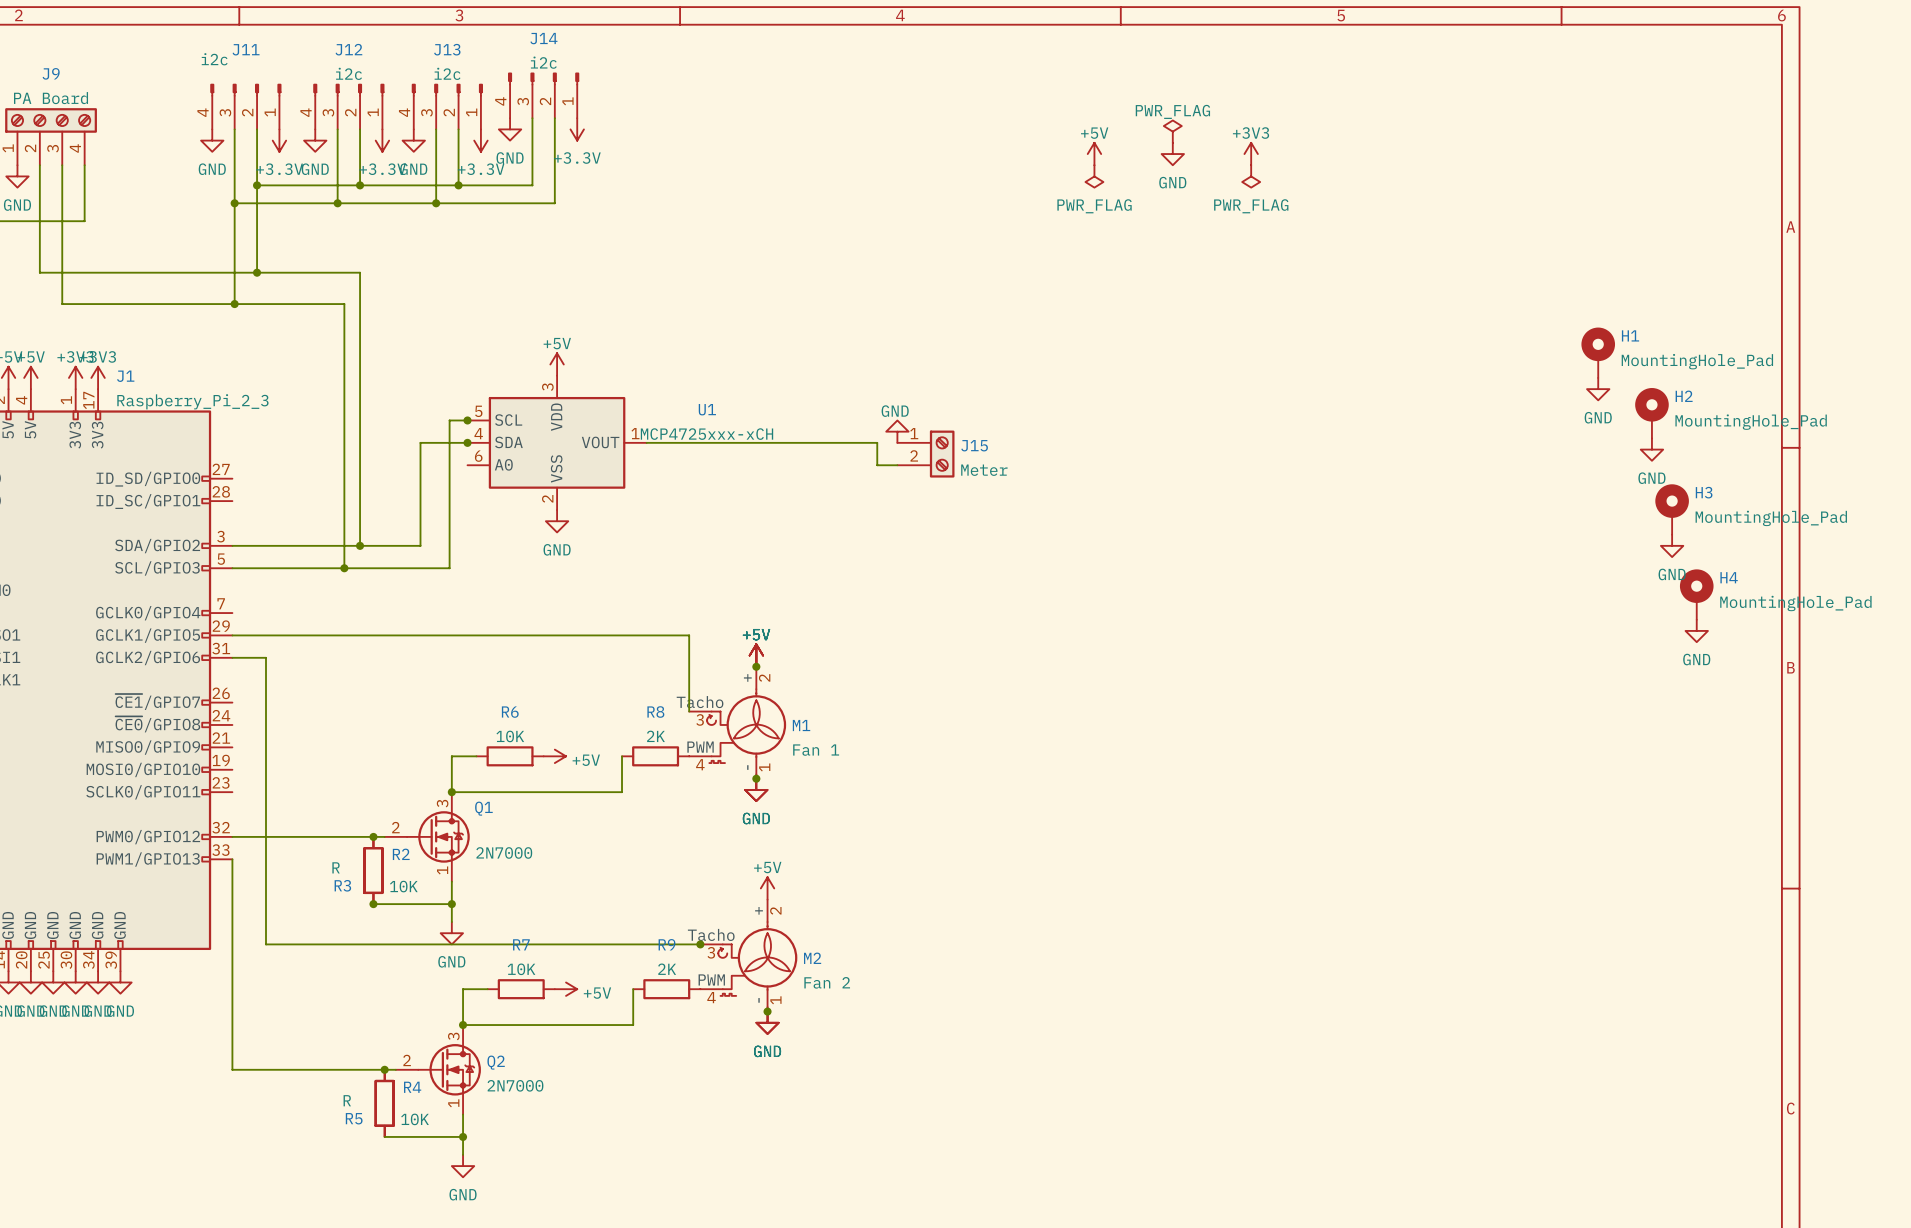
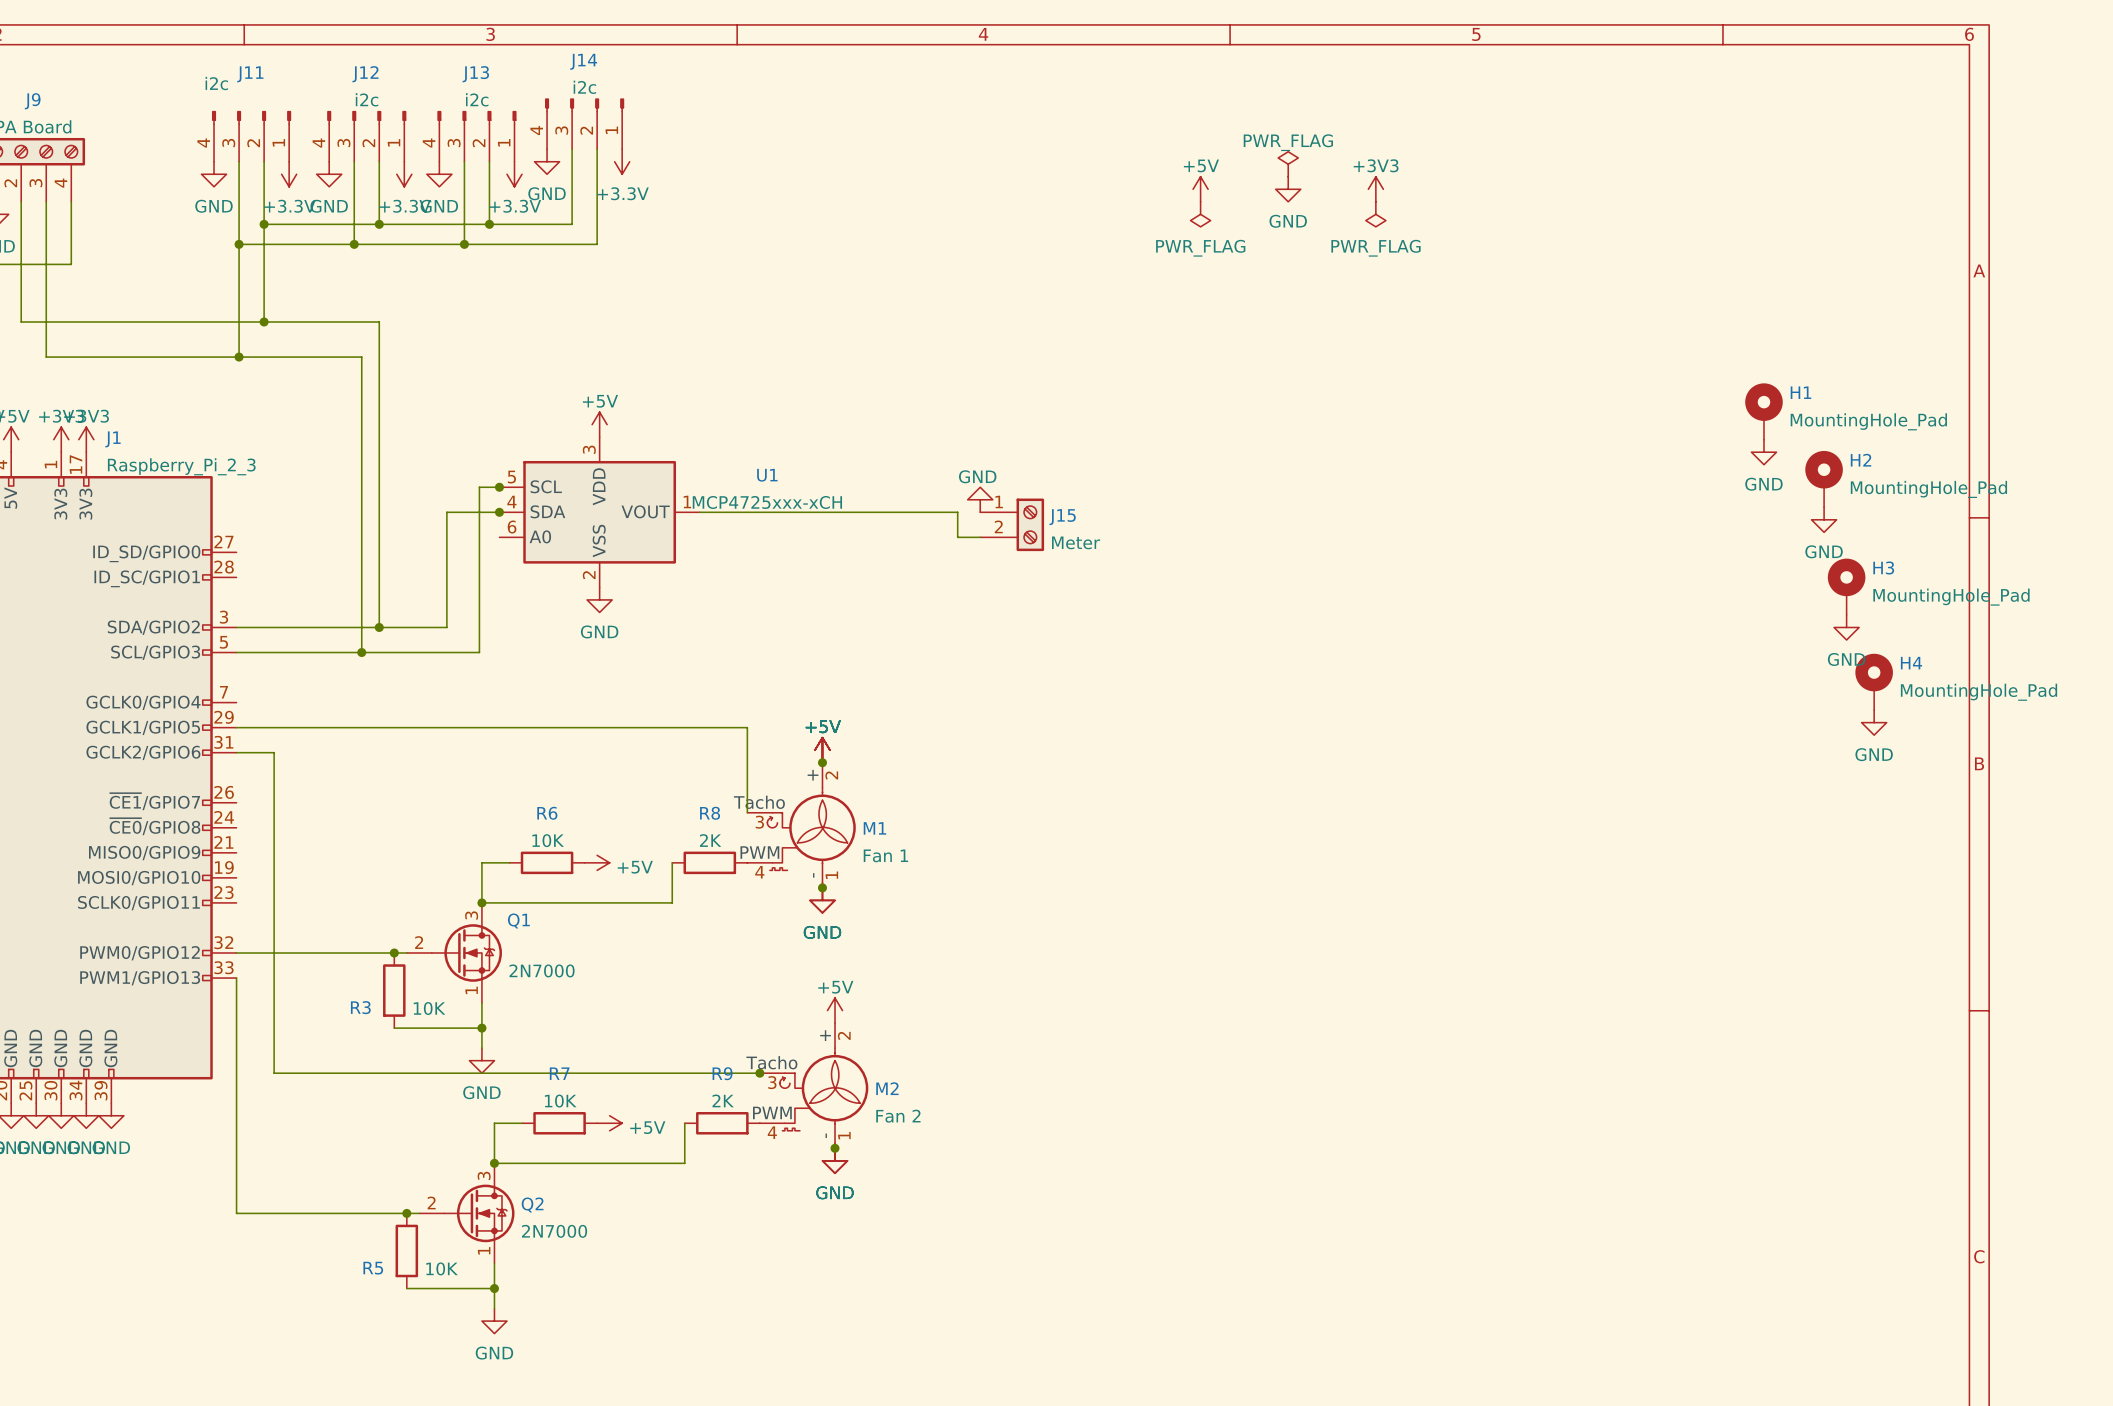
R2: R (373, 870) -> none
junction: (373, 904) -> none
R4: R (384, 1103) -> none

